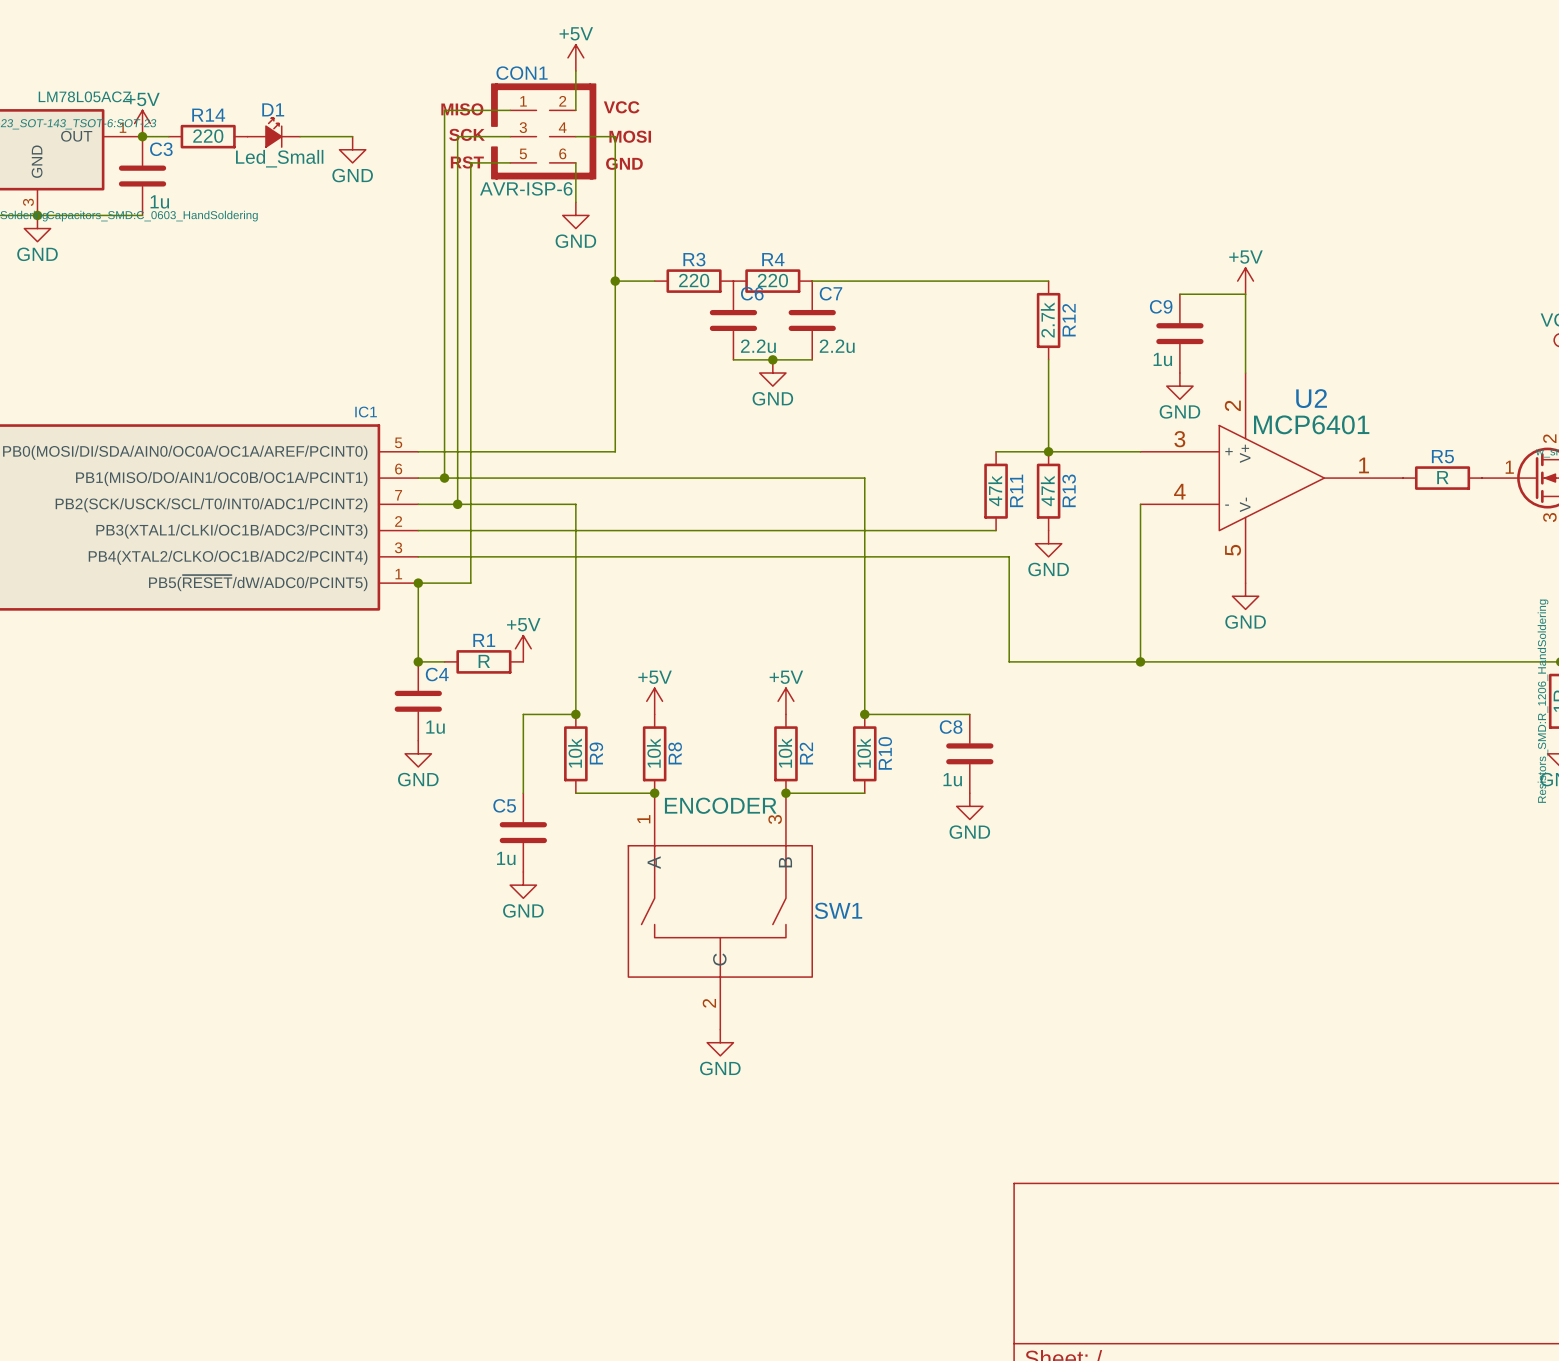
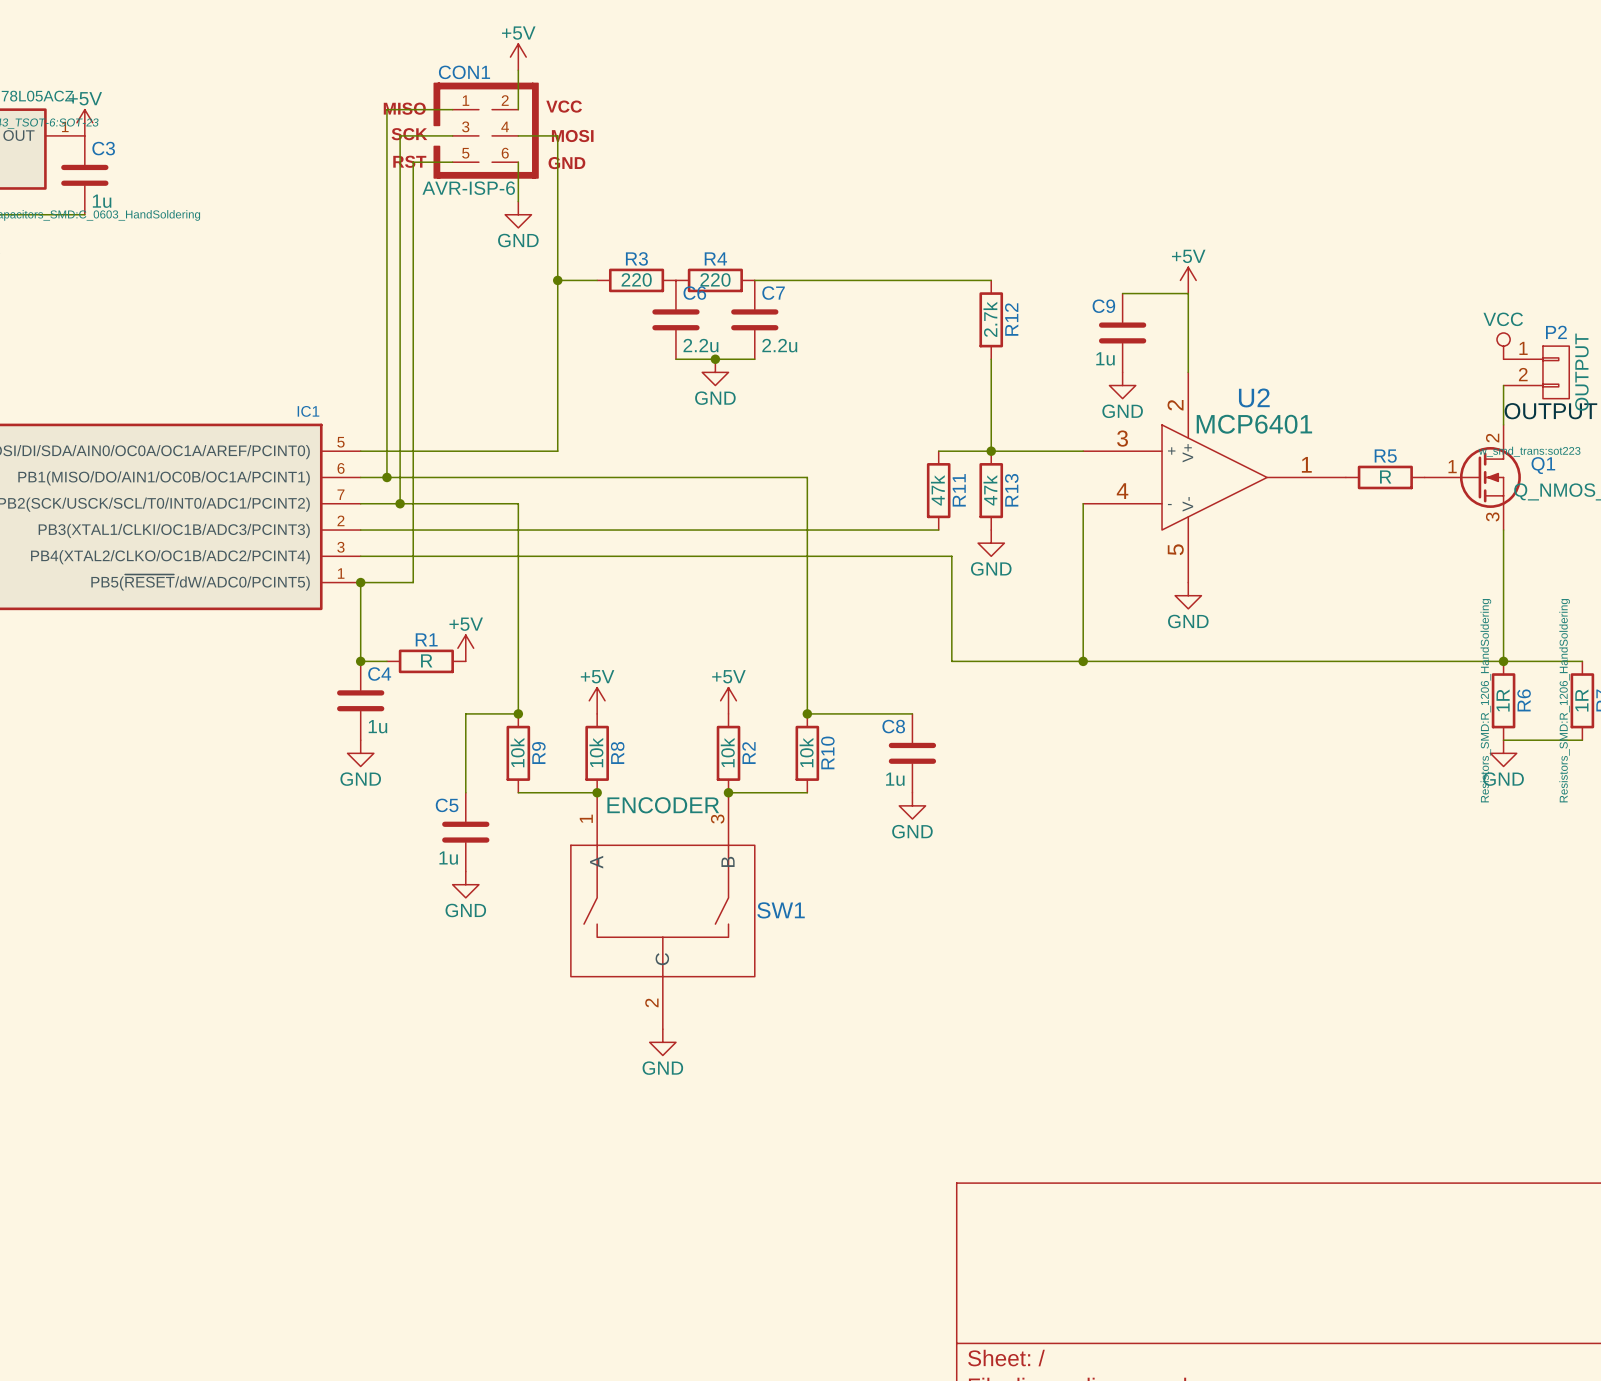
D1: Led_Small (273, 132) -> none
wire: (142, 136) (168, 136) -> none
junction: (142, 136) -> none
R14: 220 (208, 136) -> none
wire: (300, 136) (352, 136) -> none
power symbol: GND (352, 149) -> none

